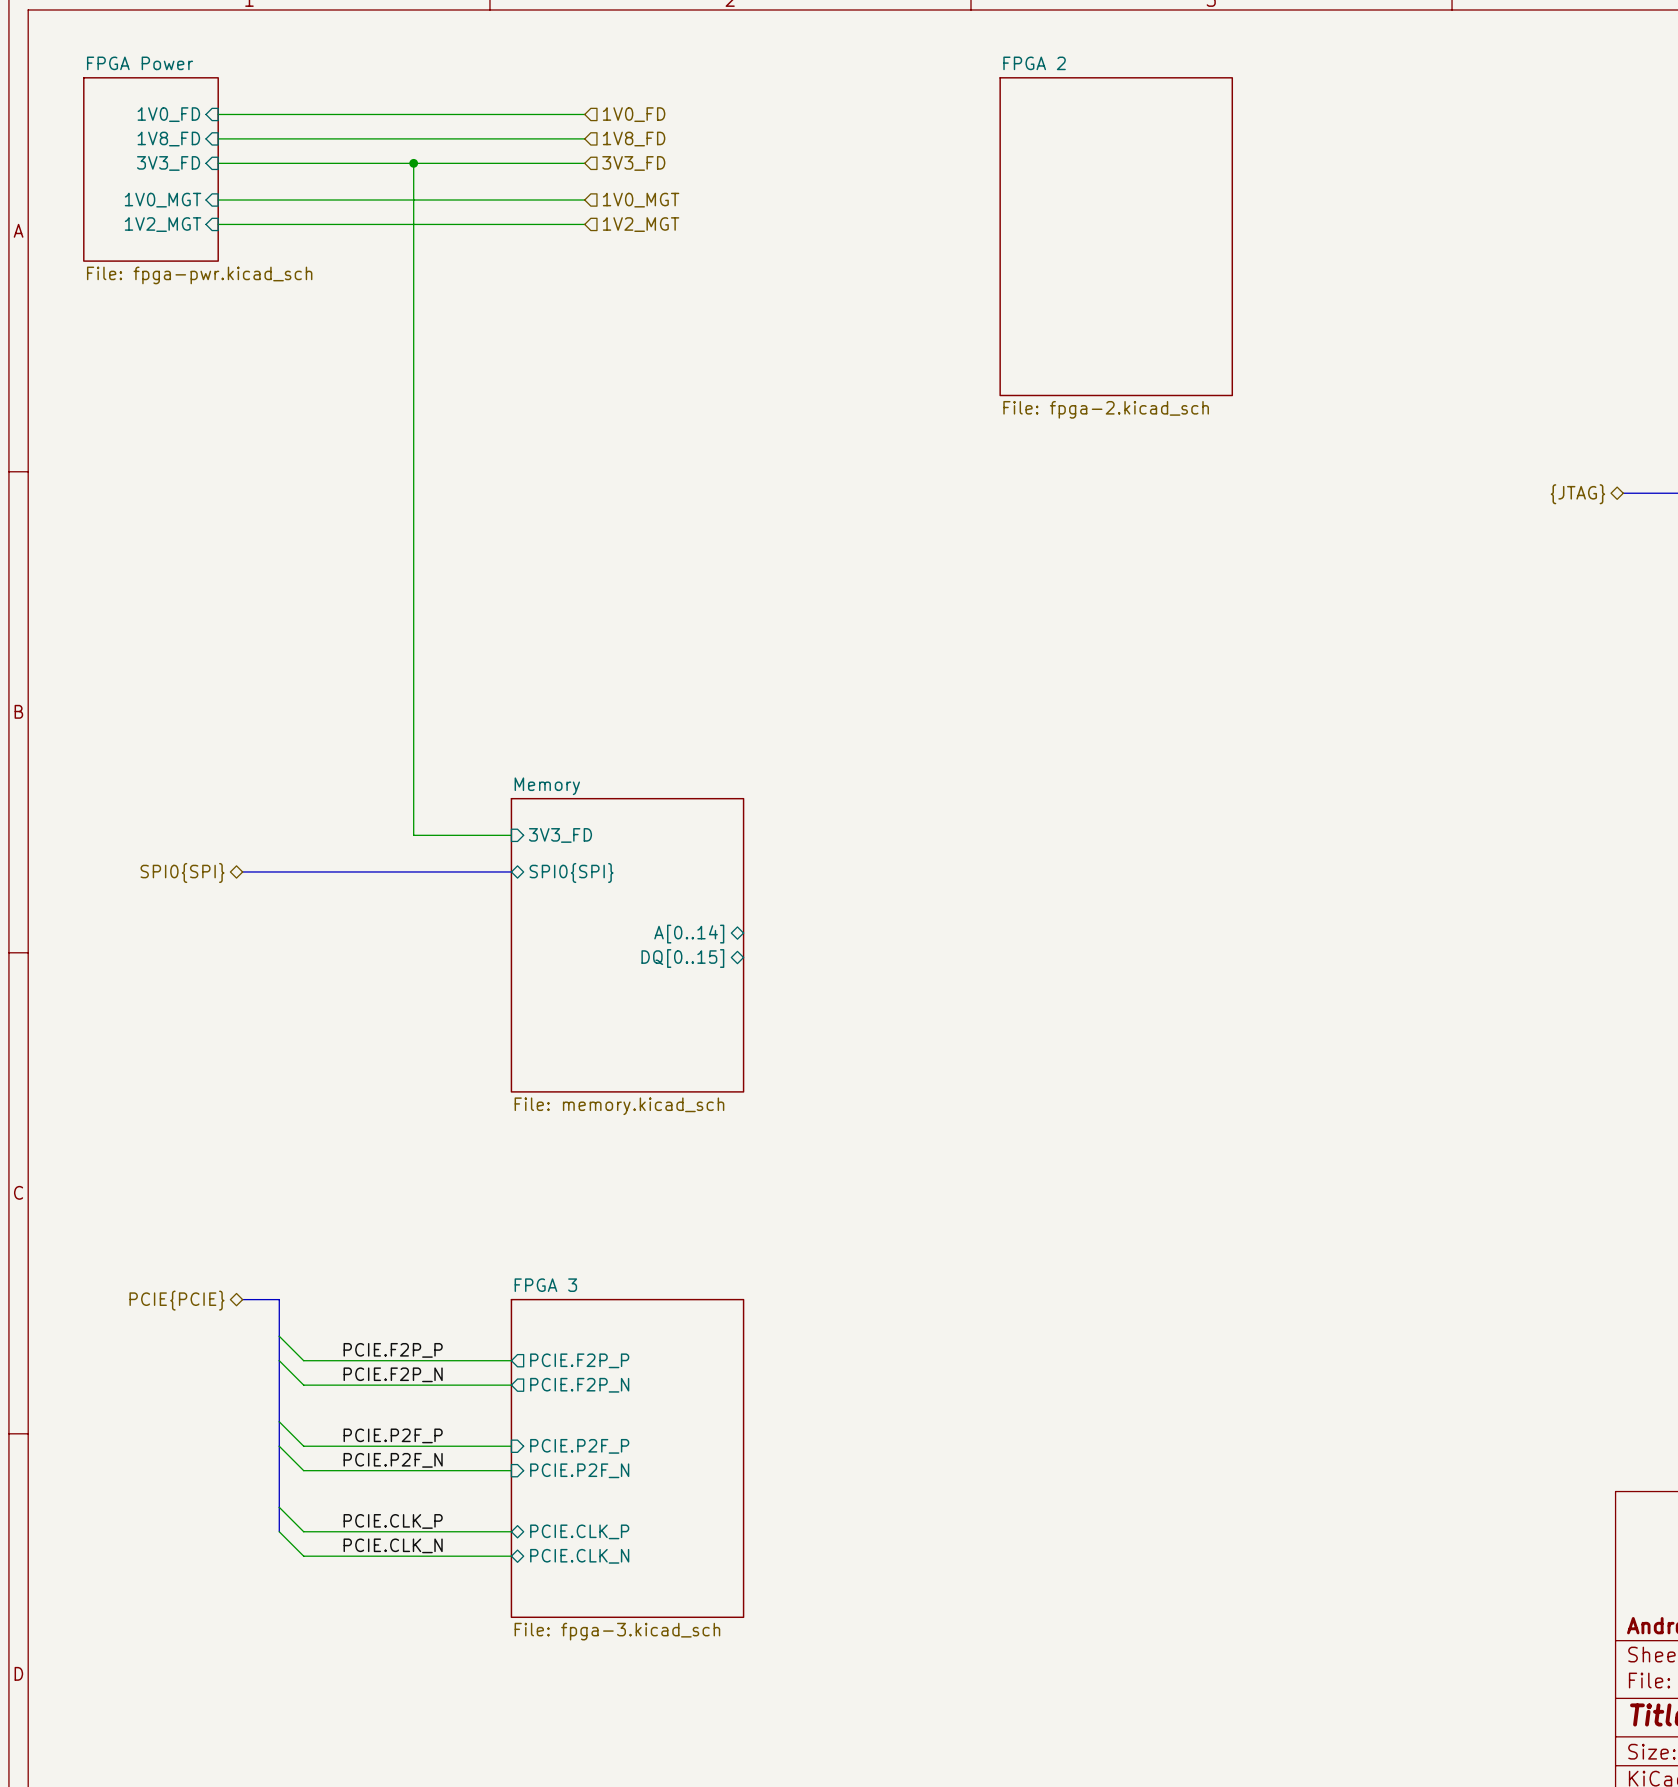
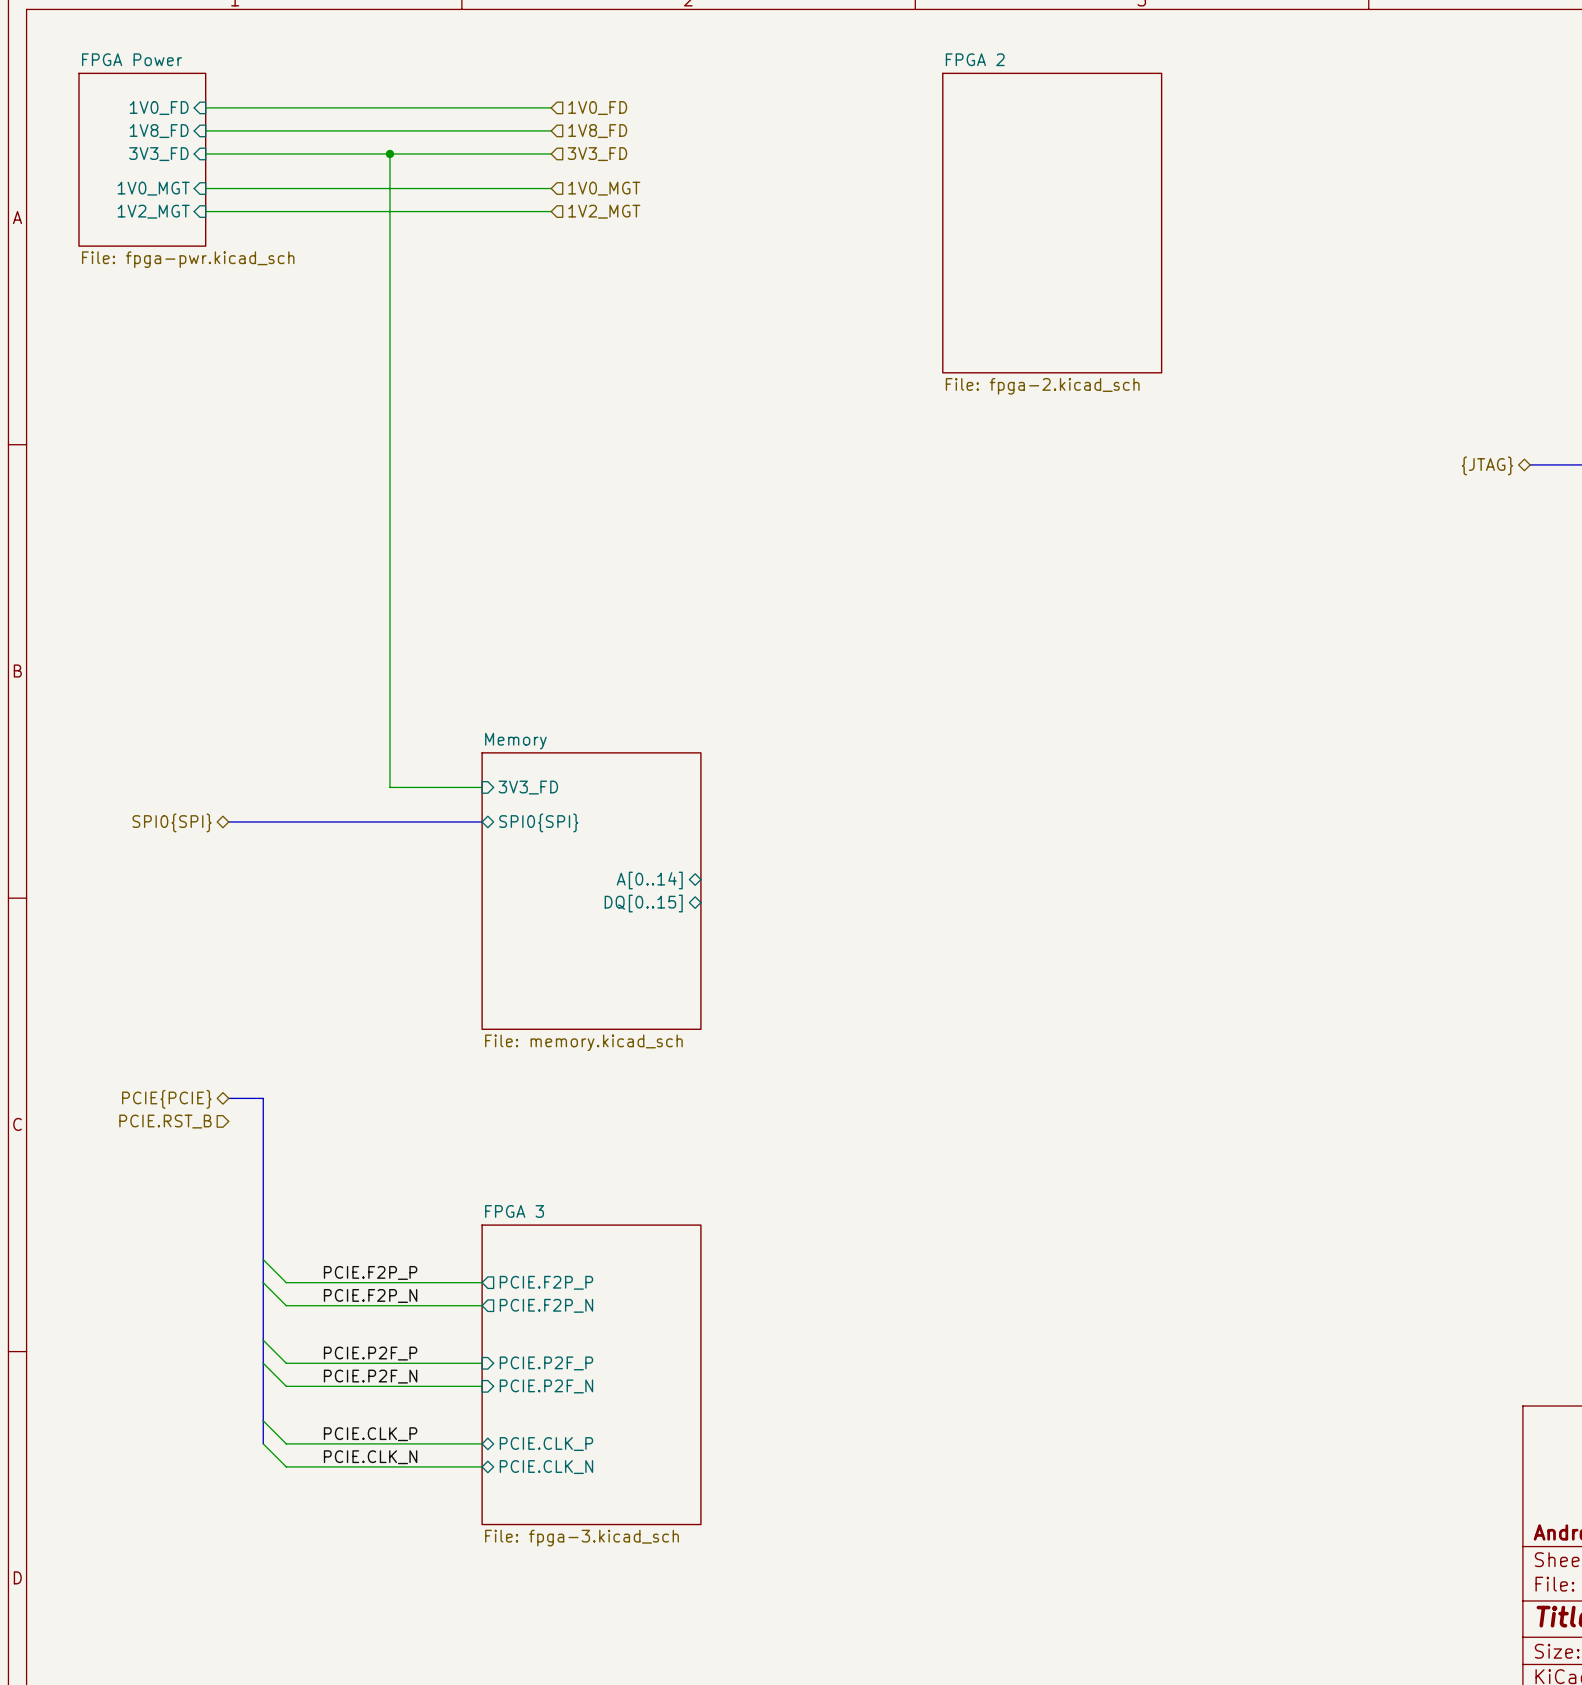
hierarchical label: none -> PCIE.RST_B (165, 1121)
bus: (242, 1299) (279, 1299) -> (228, 1098) (263, 1098) (263, 1225)
hierarchical label position: PCIE{PCIE} (176, 1300) -> PCIE{PCIE} (166, 1099)

